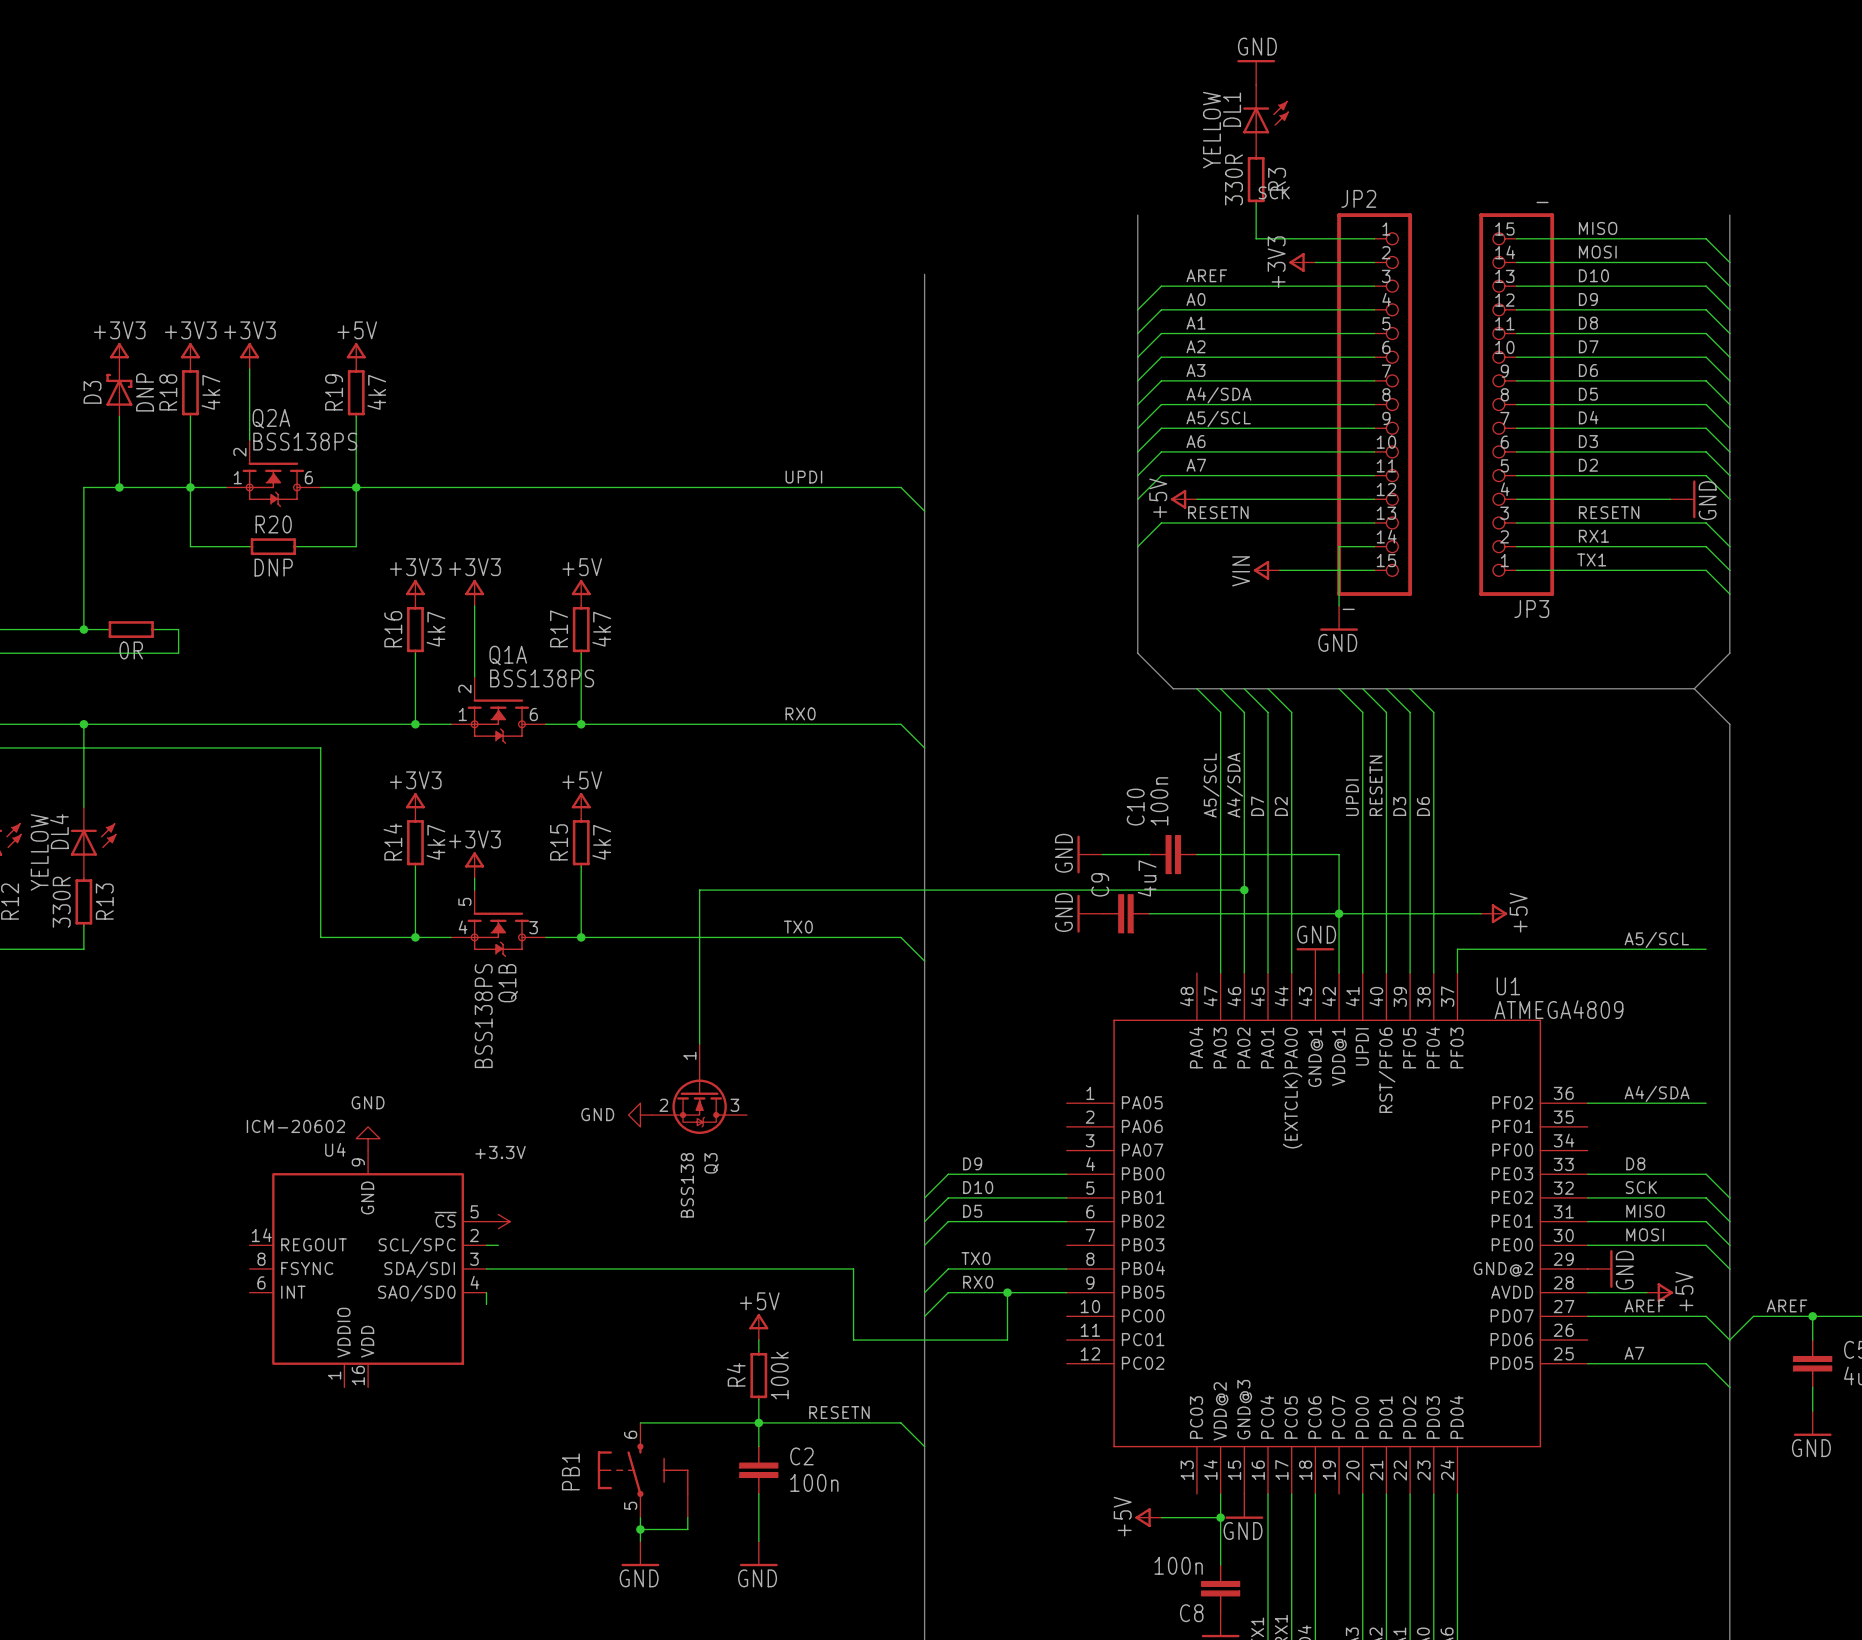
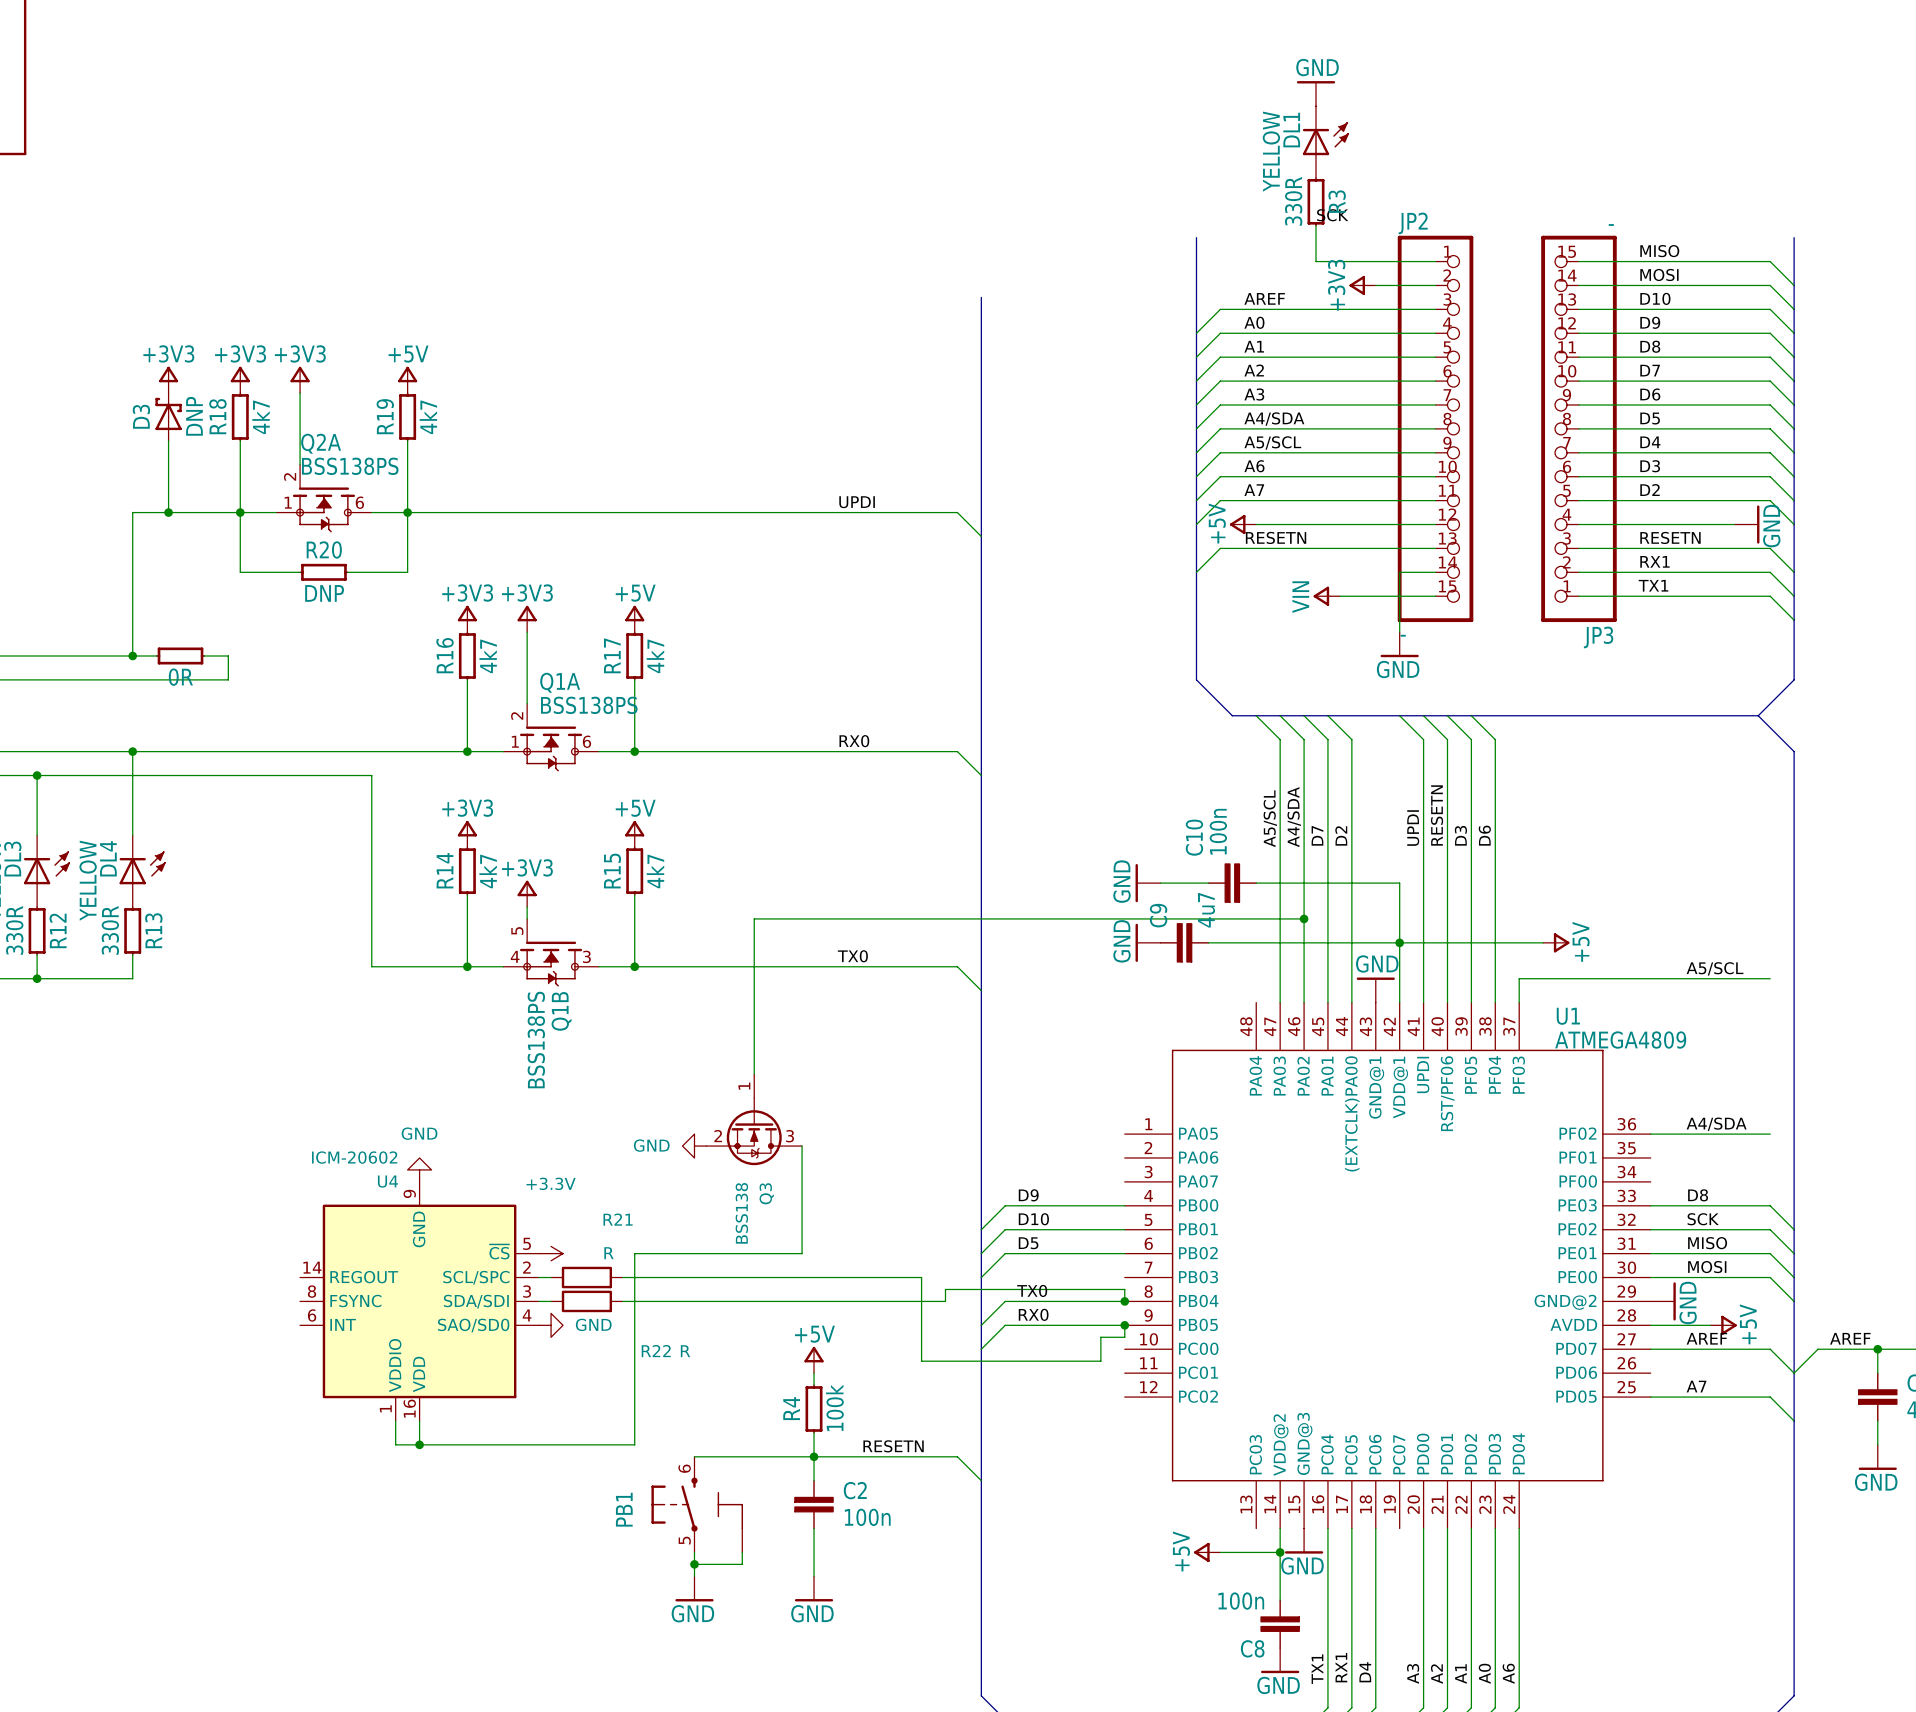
wire: none -> (802, 1146) (802, 1253) (634, 1253) (634, 1444) (395, 1444) (395, 1420)
R21: none -> R (586, 1277)
wire: none -> (622, 1277) (921, 1277) (921, 1361) (1100, 1361) (1100, 1337) (1124, 1337) (1124, 1325)
wire: (498, 1268) (569, 1268) -> none
R22: none -> R (586, 1301)
wire: (853, 1268) (853, 1340) (1007, 1340) (1007, 1292) -> (909, 1301) (945, 1301) (945, 1289) (1124, 1289) (1124, 1301)
junction: none -> (1124, 1301)
wire: (486, 1292) (486, 1304) -> none
power symbol: none -> GND (551, 1325)
junction: (1007, 1292) -> none
junction: none -> (1124, 1325)
wire: none -> (419, 1420) (419, 1444)
junction: none -> (419, 1444)

